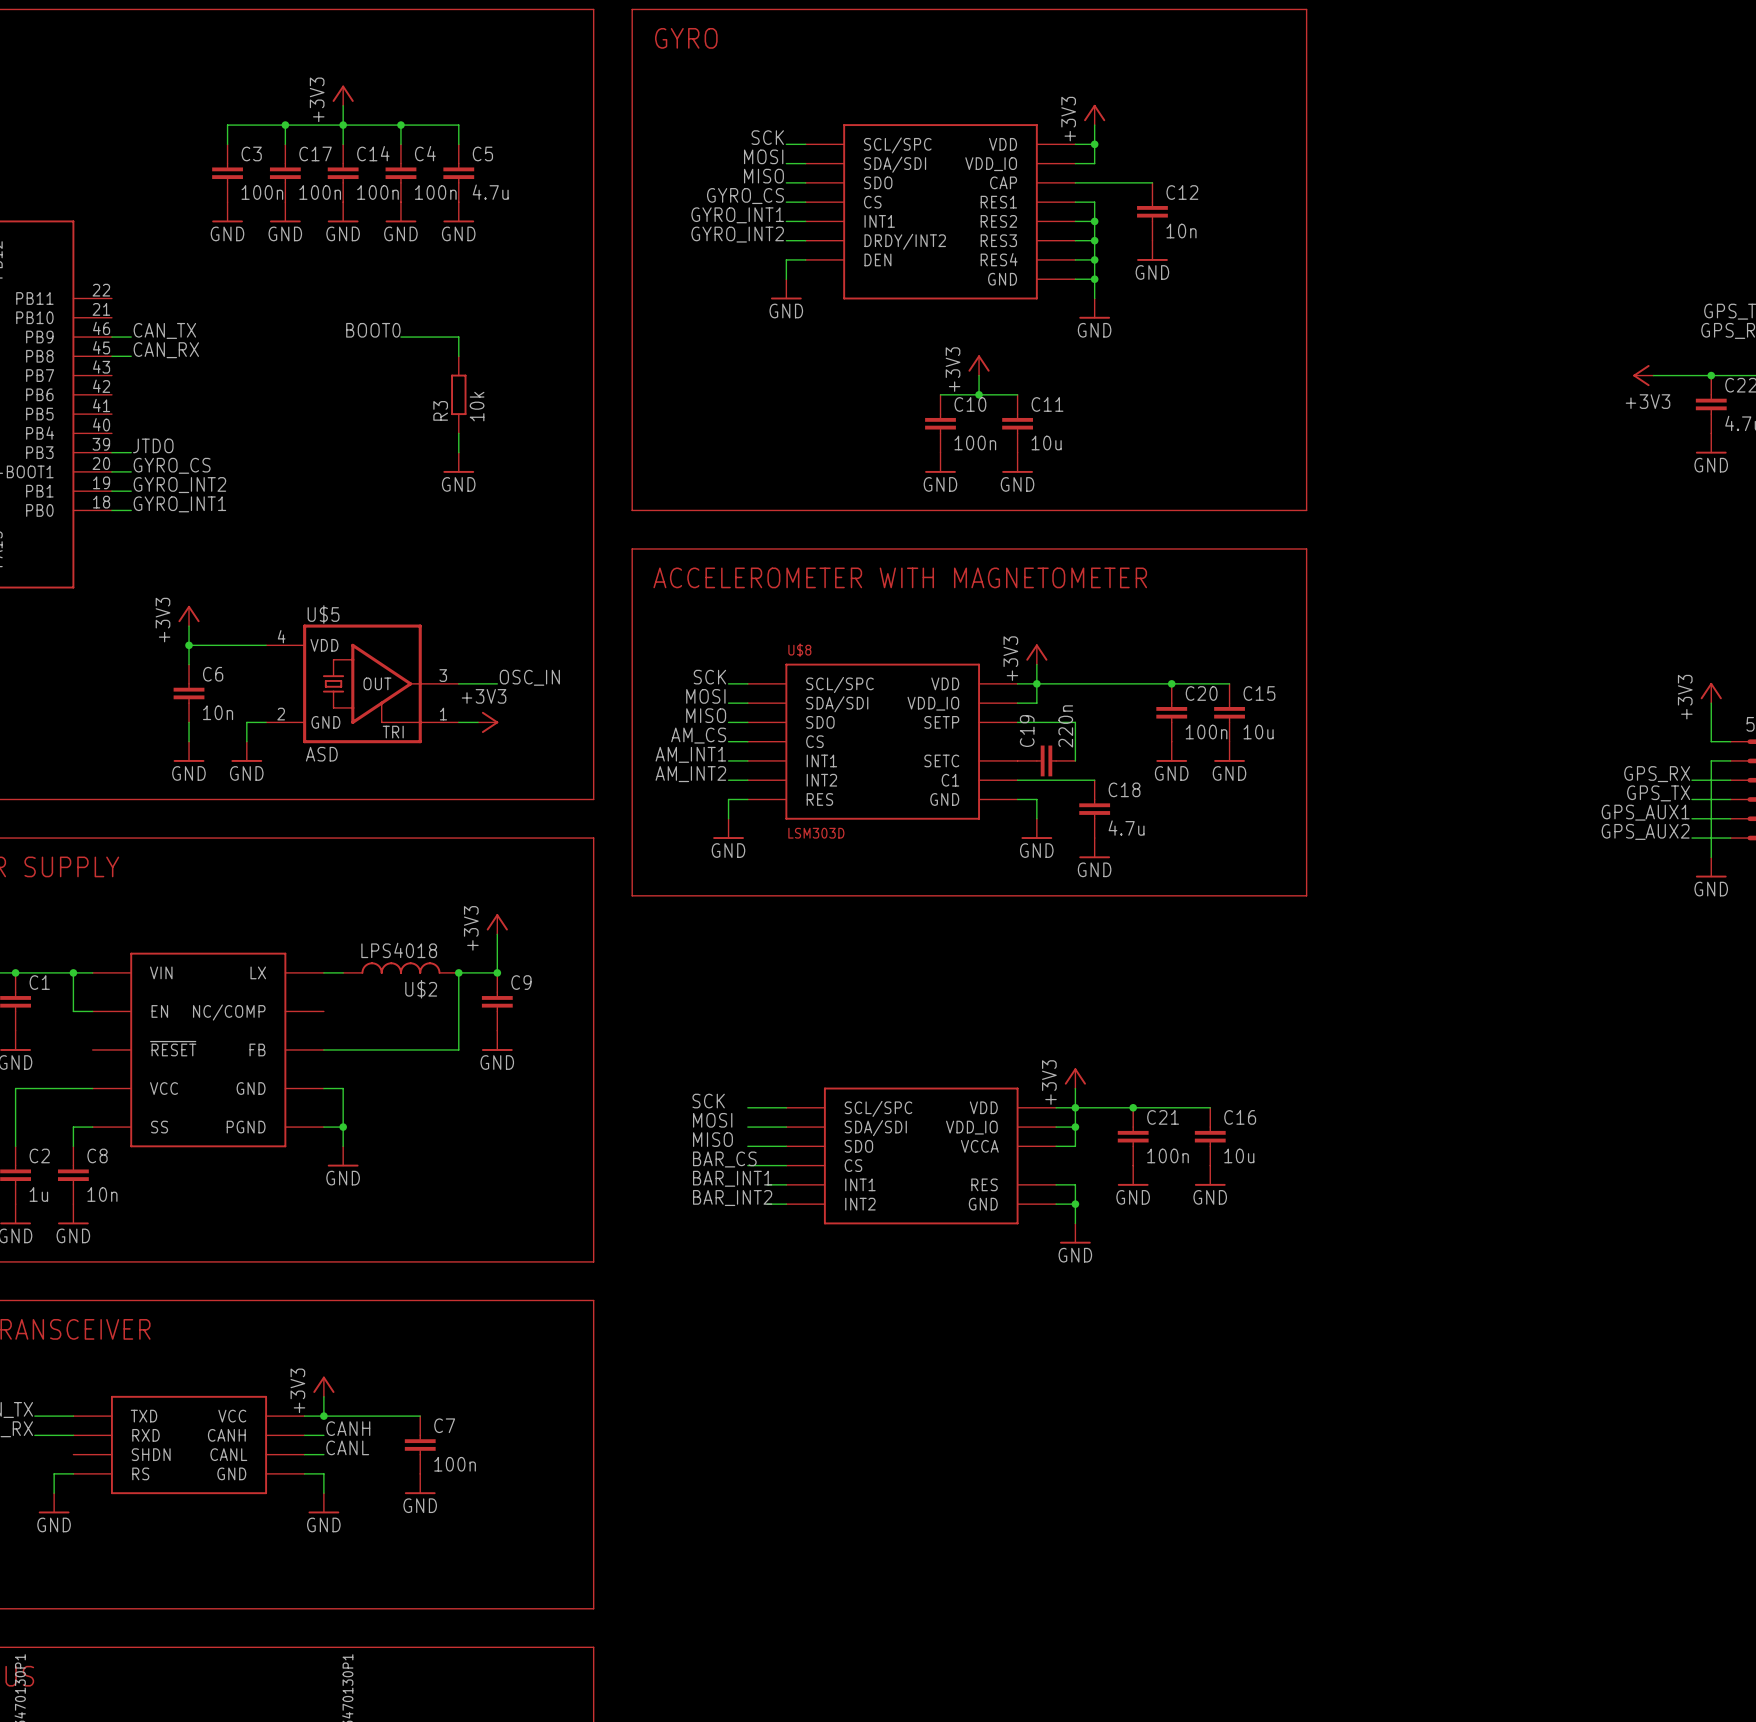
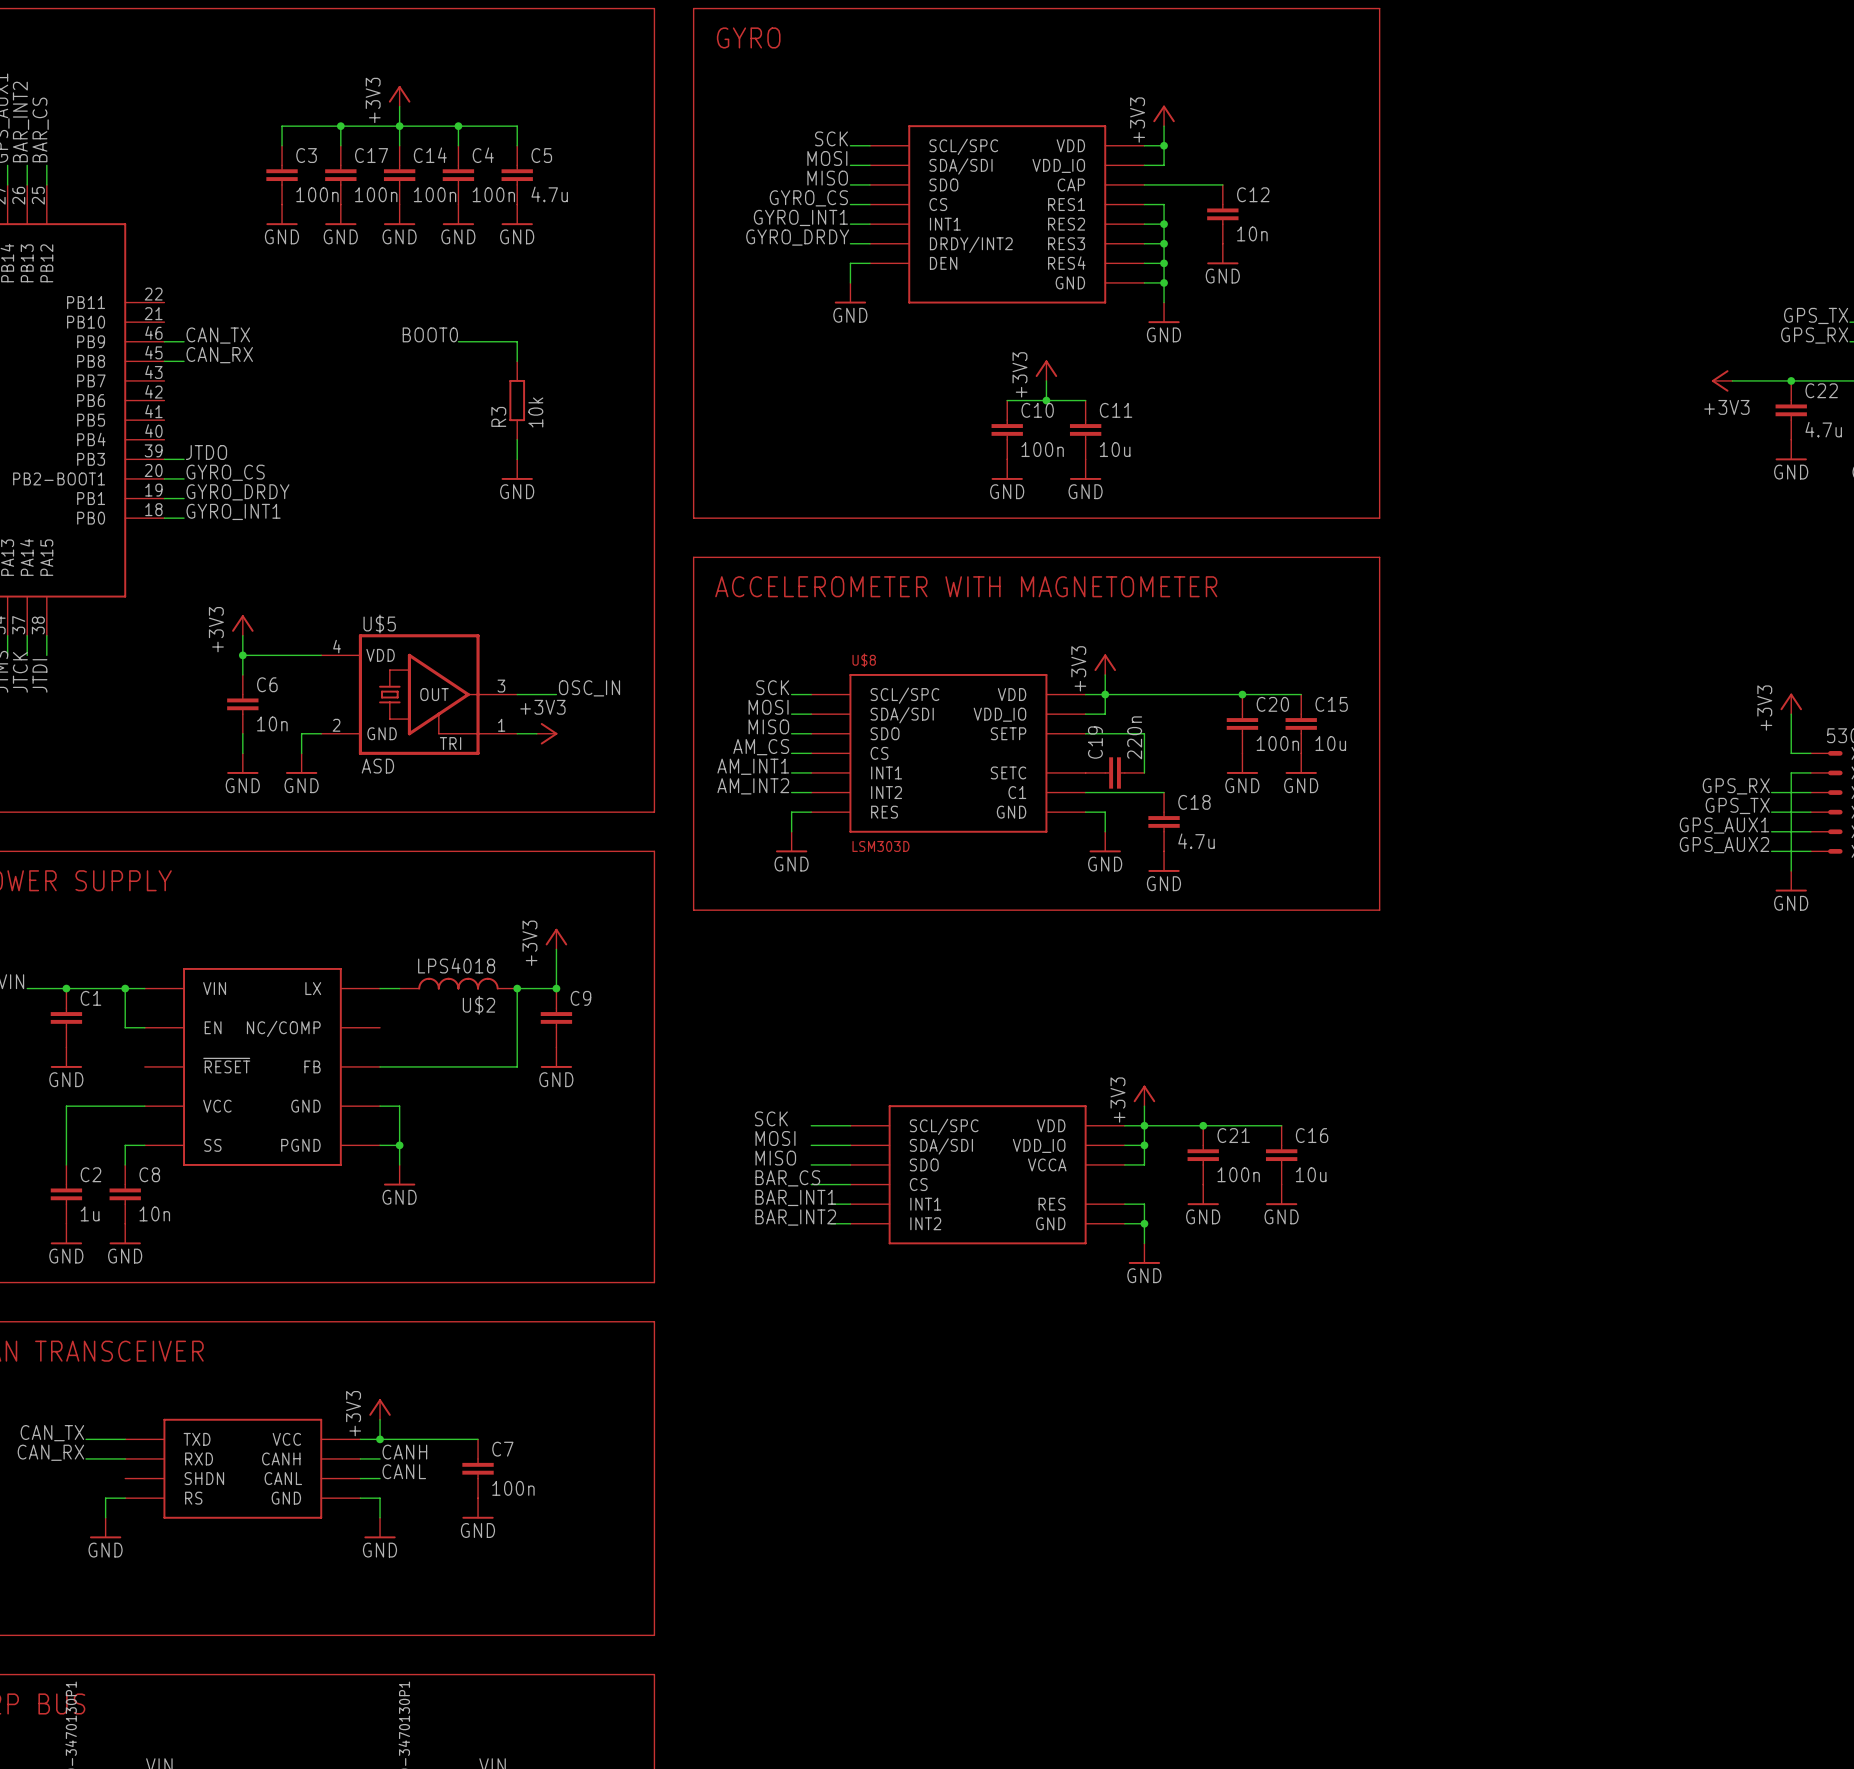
label: GYRO_INT2 (737, 234) -> GYRO_DRDY (797, 237)
label: GYRO_INT2 (179, 485) -> GYRO_DRDY (237, 492)

